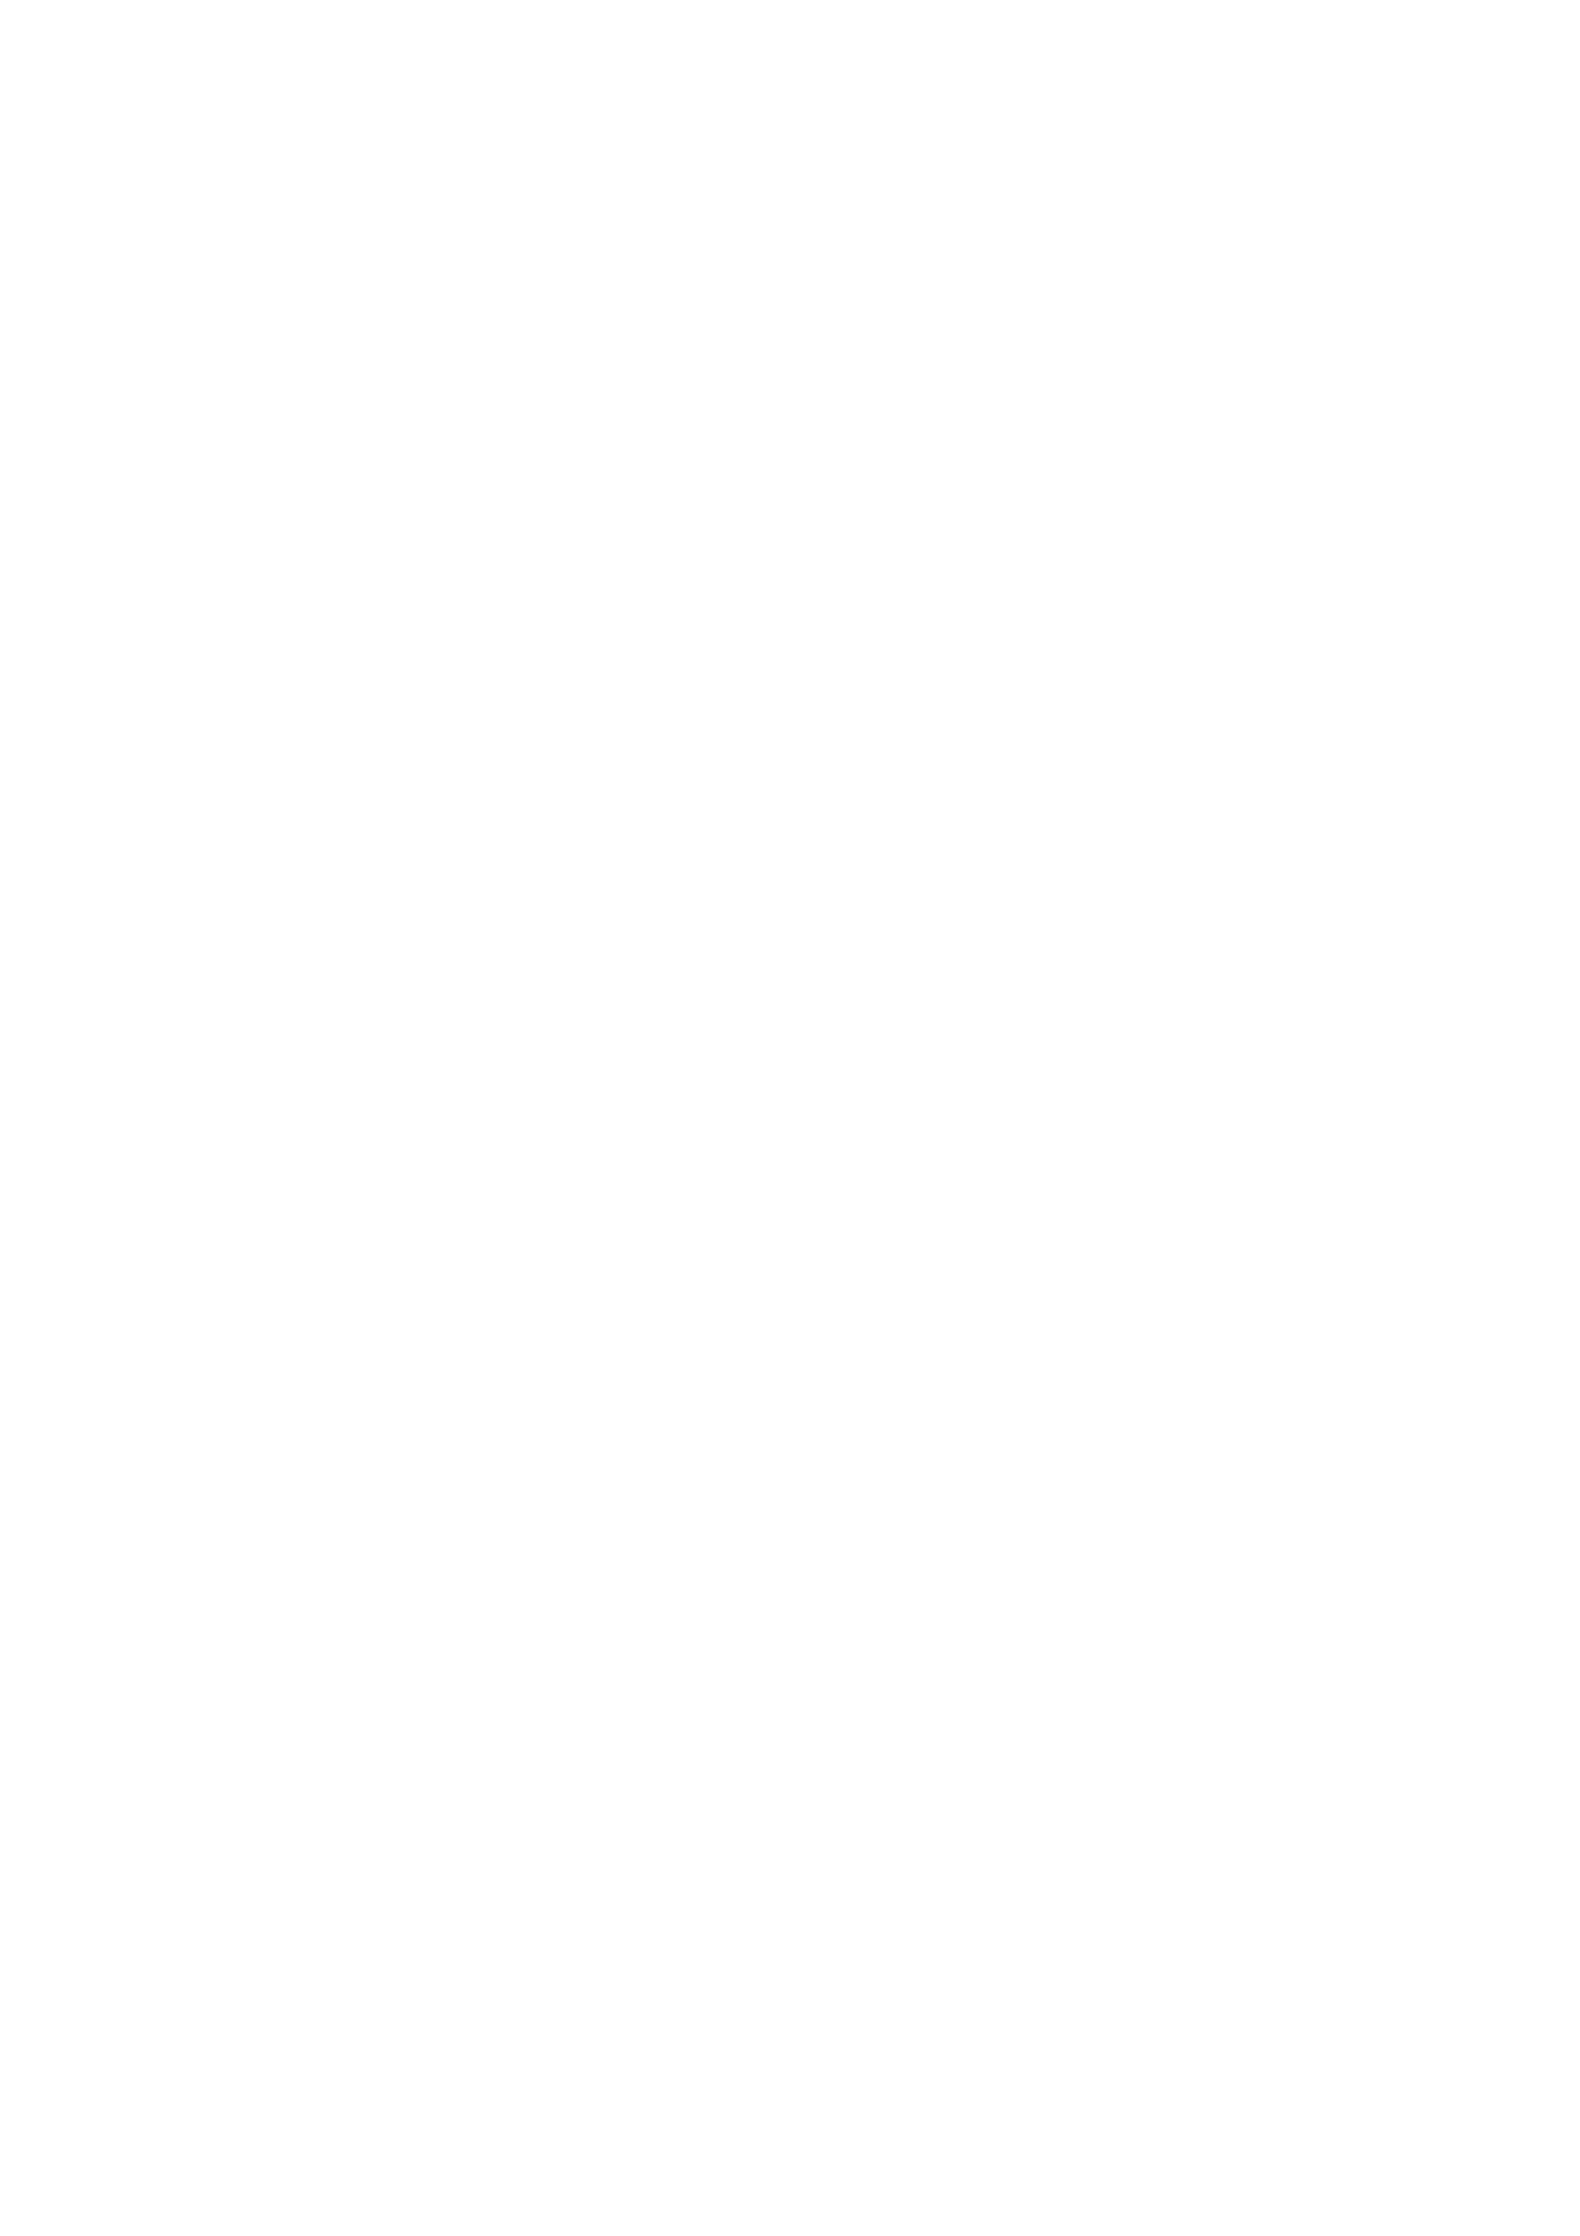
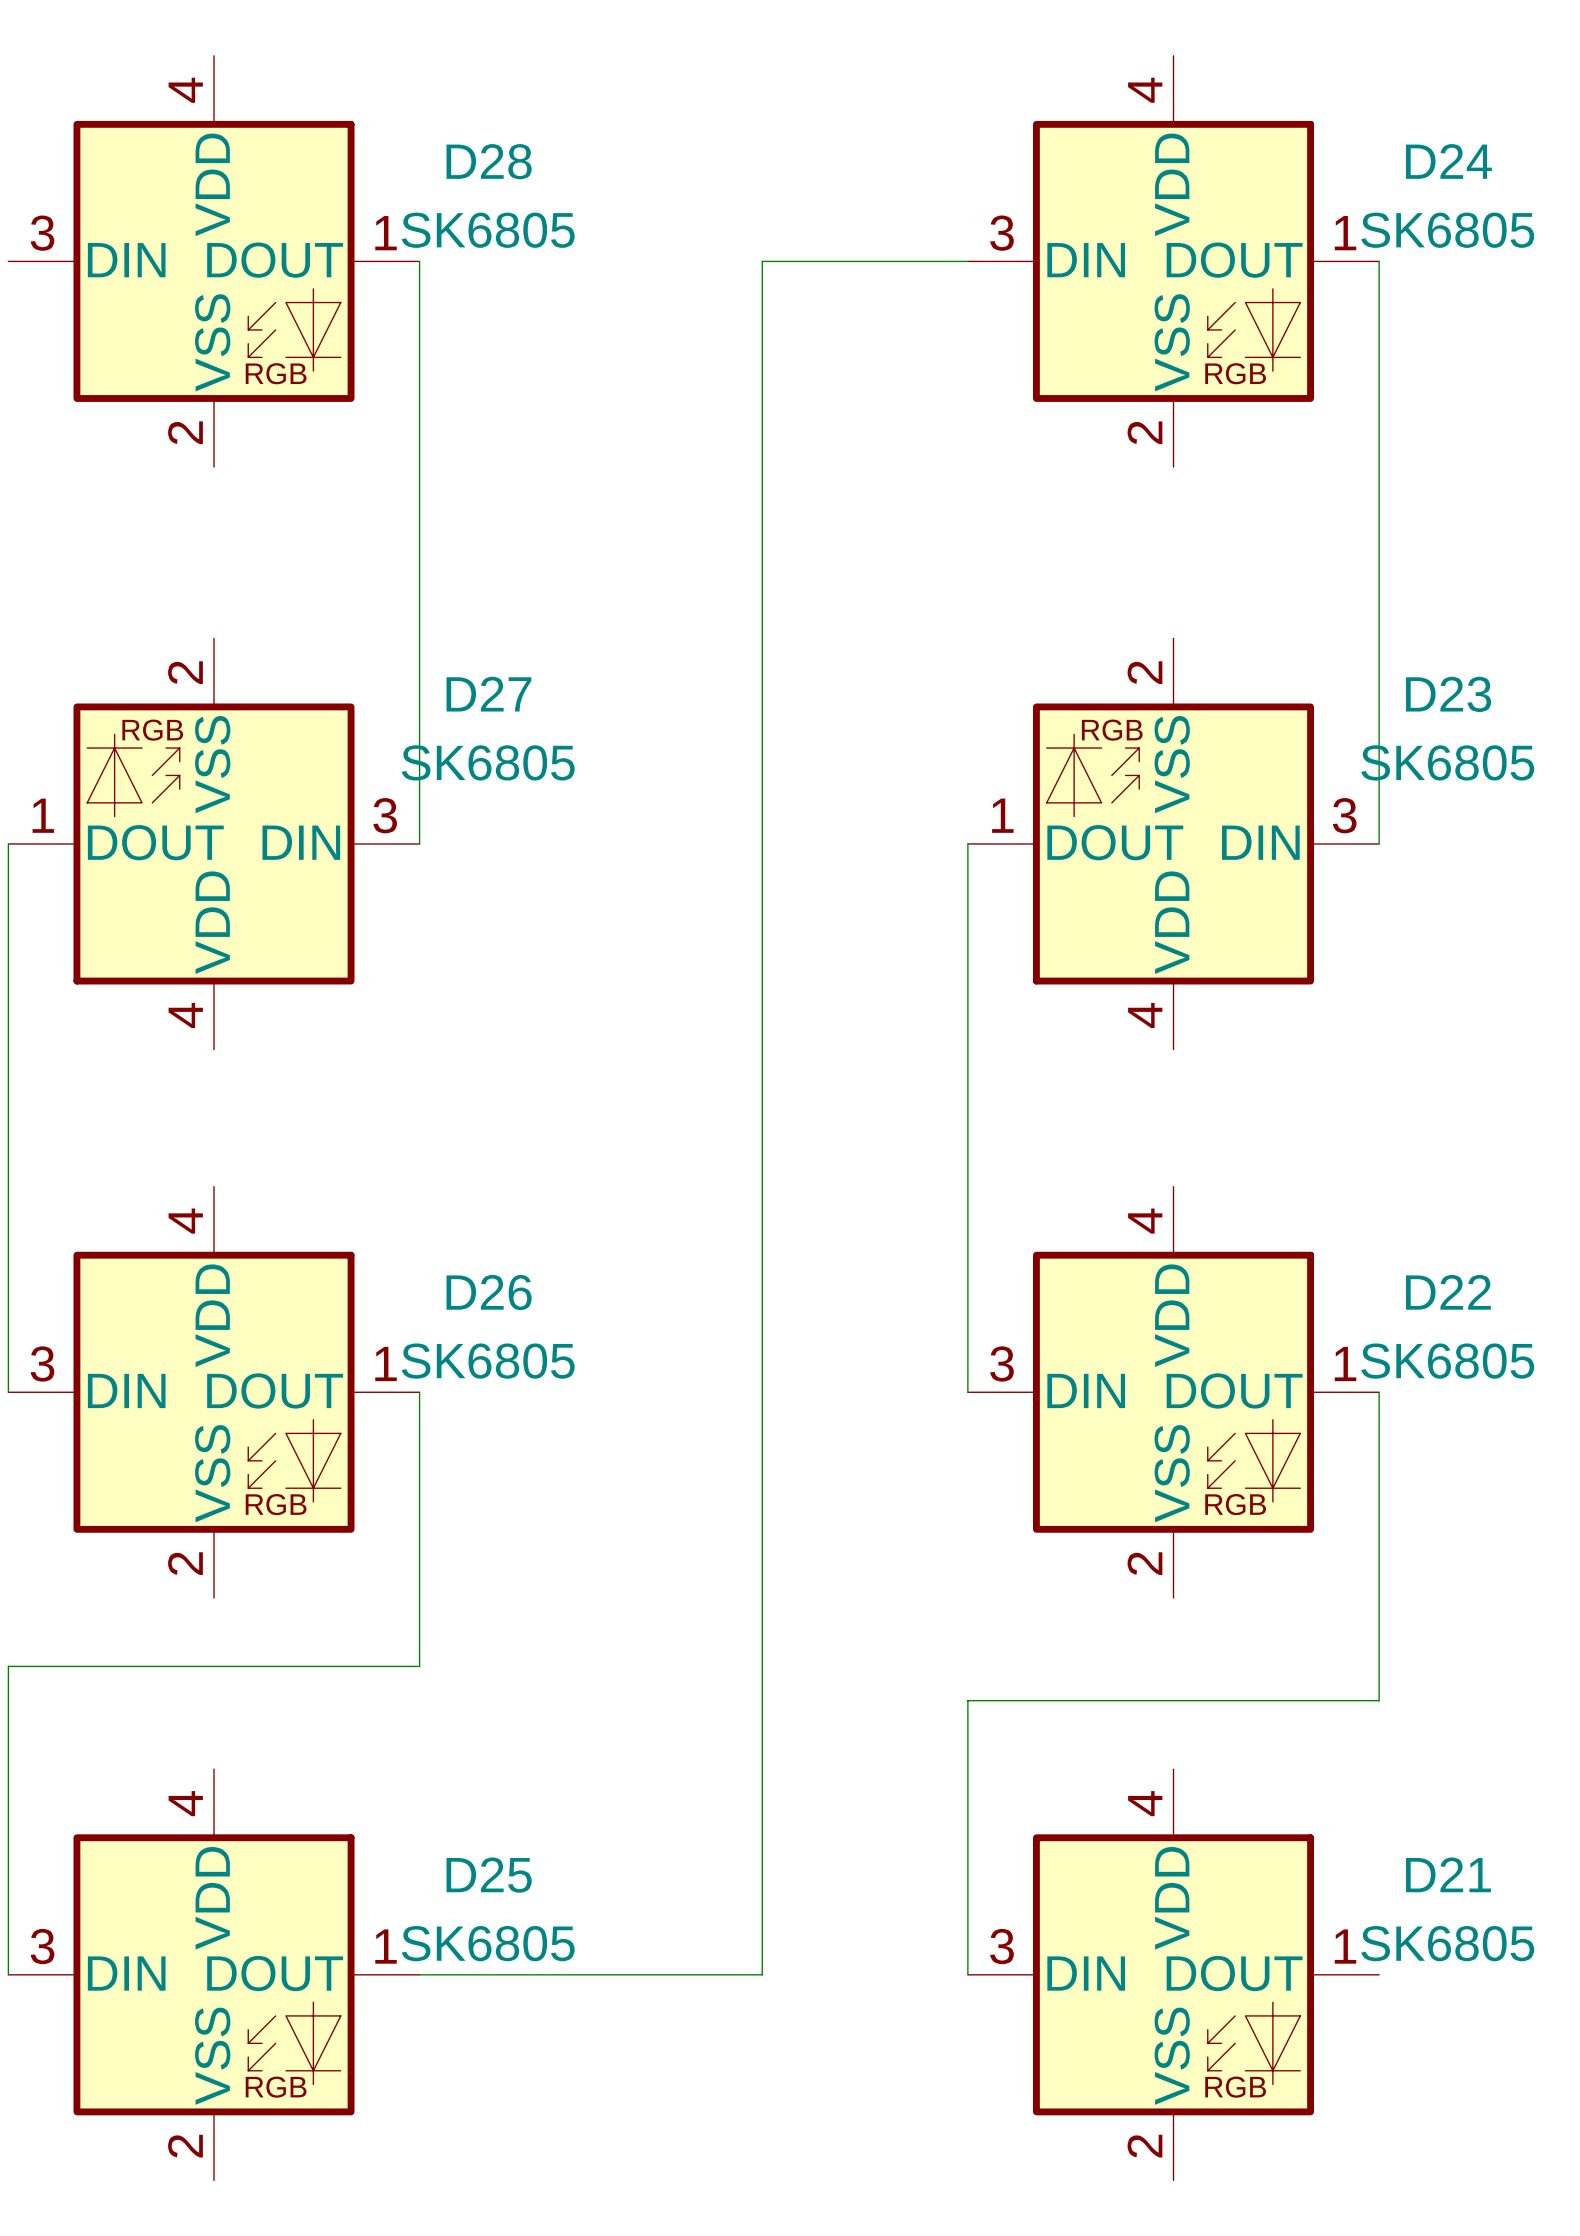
D28: none -> SK6805 (213, 261)
wire: none -> (419, 261) (419, 843)
wire: none -> (967, 261) (762, 261) (762, 1974) (419, 1974)
D24: none -> SK6805 (1173, 261)
wire: none -> (1379, 261) (1379, 843)
wire: none -> (8, 843) (8, 1392)
D27: none -> SK6805 (213, 843)
wire: none -> (967, 843) (967, 1392)
D23: none -> SK6805 (1173, 843)
D26: none -> SK6805 (213, 1392)
wire: none -> (419, 1392) (419, 1666) (8, 1666) (8, 1974)
D22: none -> SK6805 (1173, 1392)
wire: none -> (1379, 1392) (1379, 1700) (967, 1700) (967, 1974)
D25: none -> SK6805 (213, 1974)
D21: none -> SK6805 (1173, 1974)

